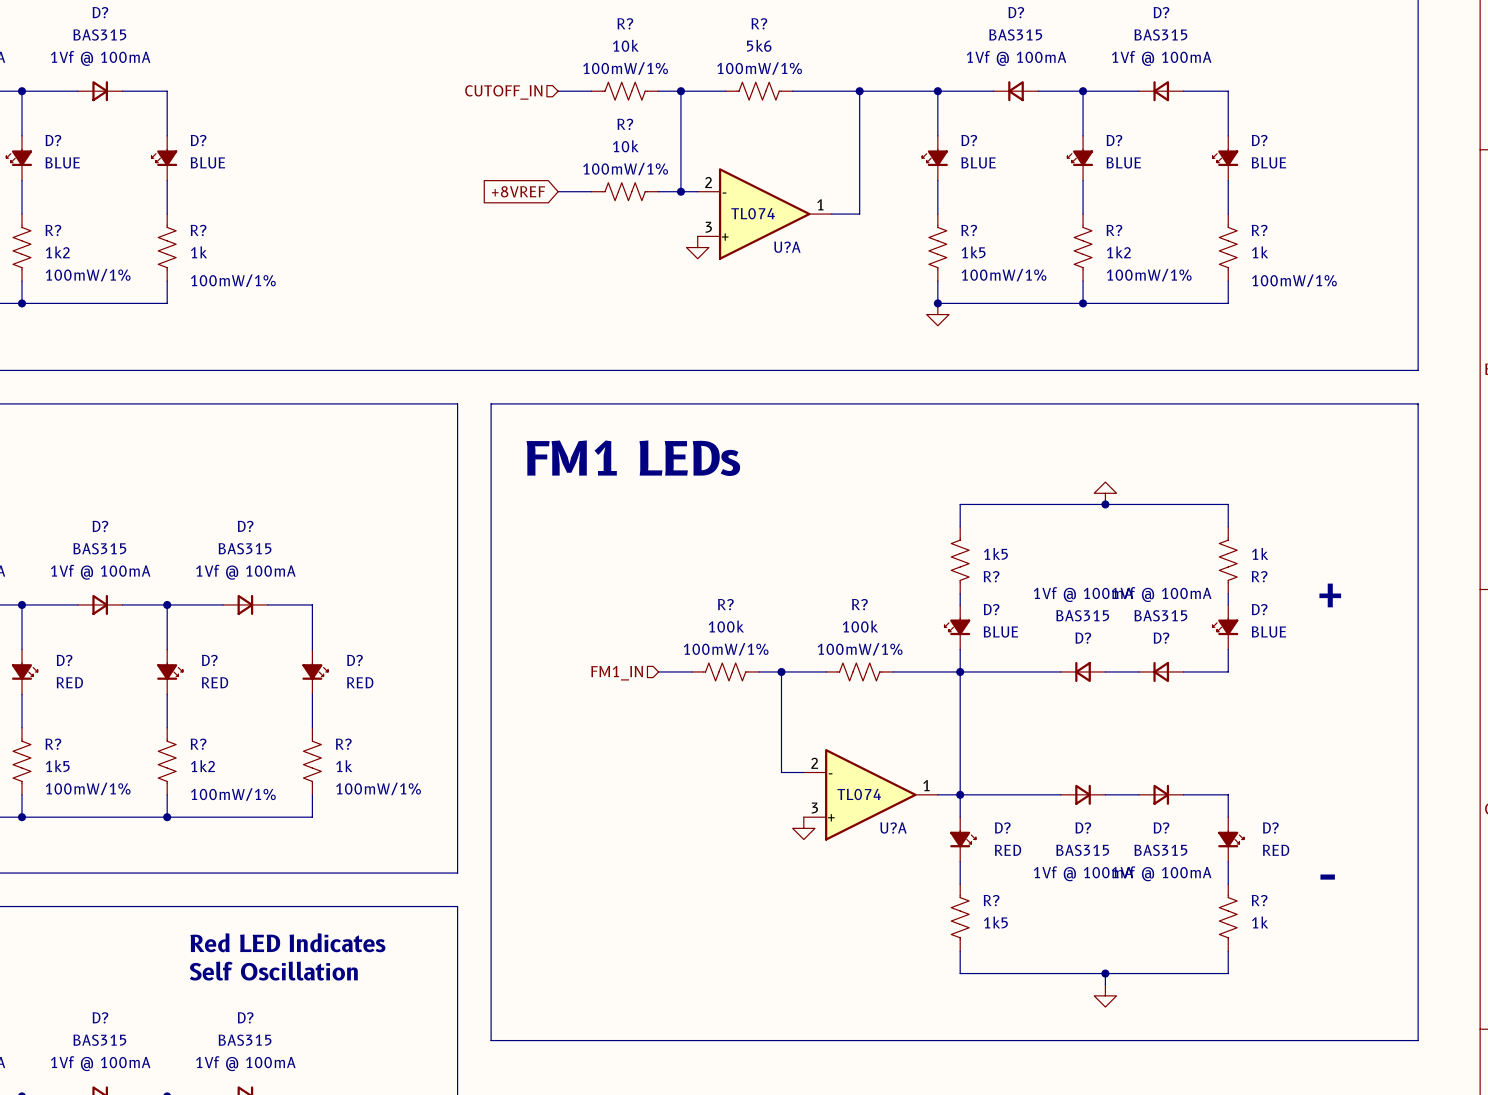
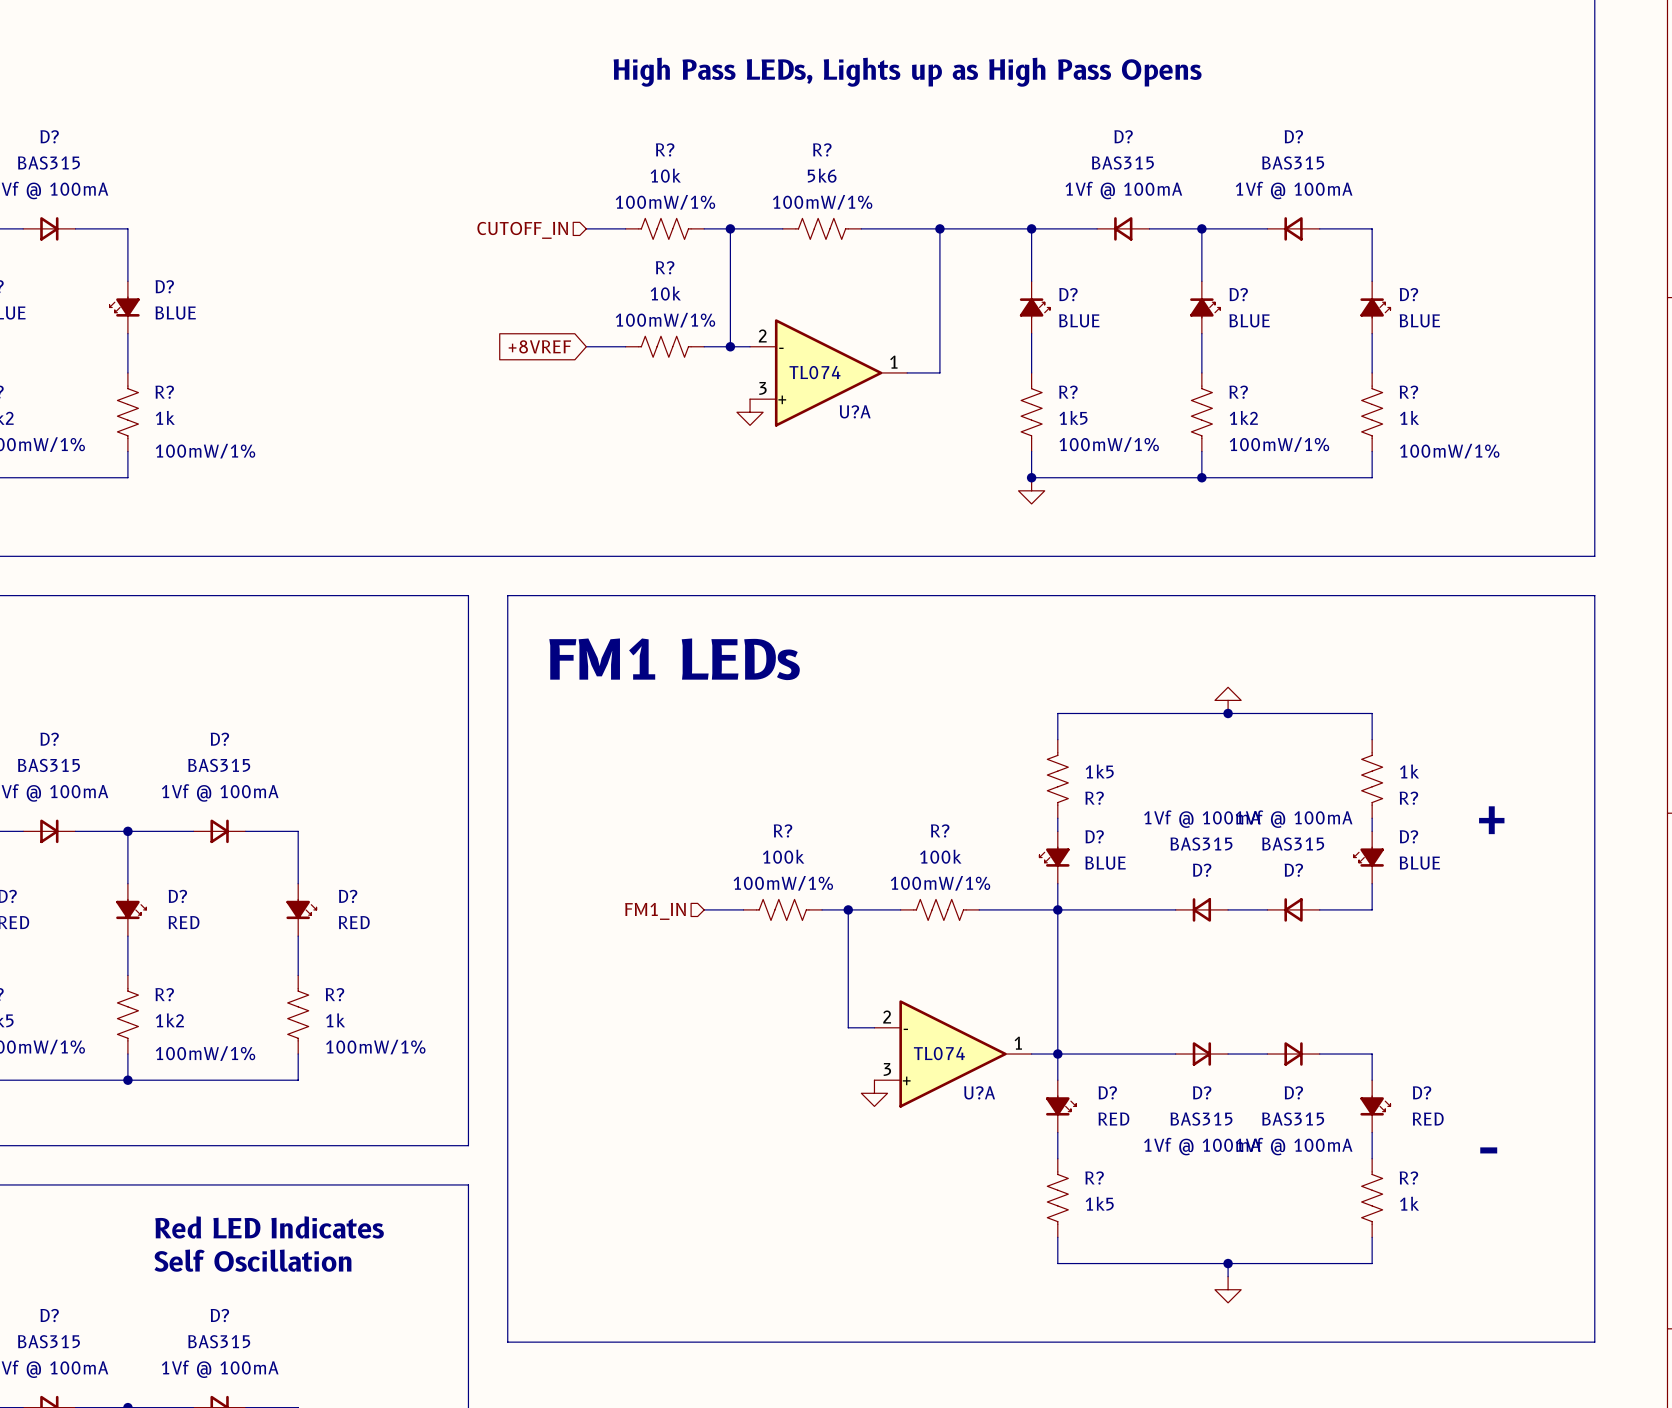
D? rotation: 0° (935, 157) -> 180° (1034, 308)
D? rotation: 0° (1080, 157) -> 180° (1205, 308)
D? rotation: 0° (1225, 157) -> 180° (1375, 308)

